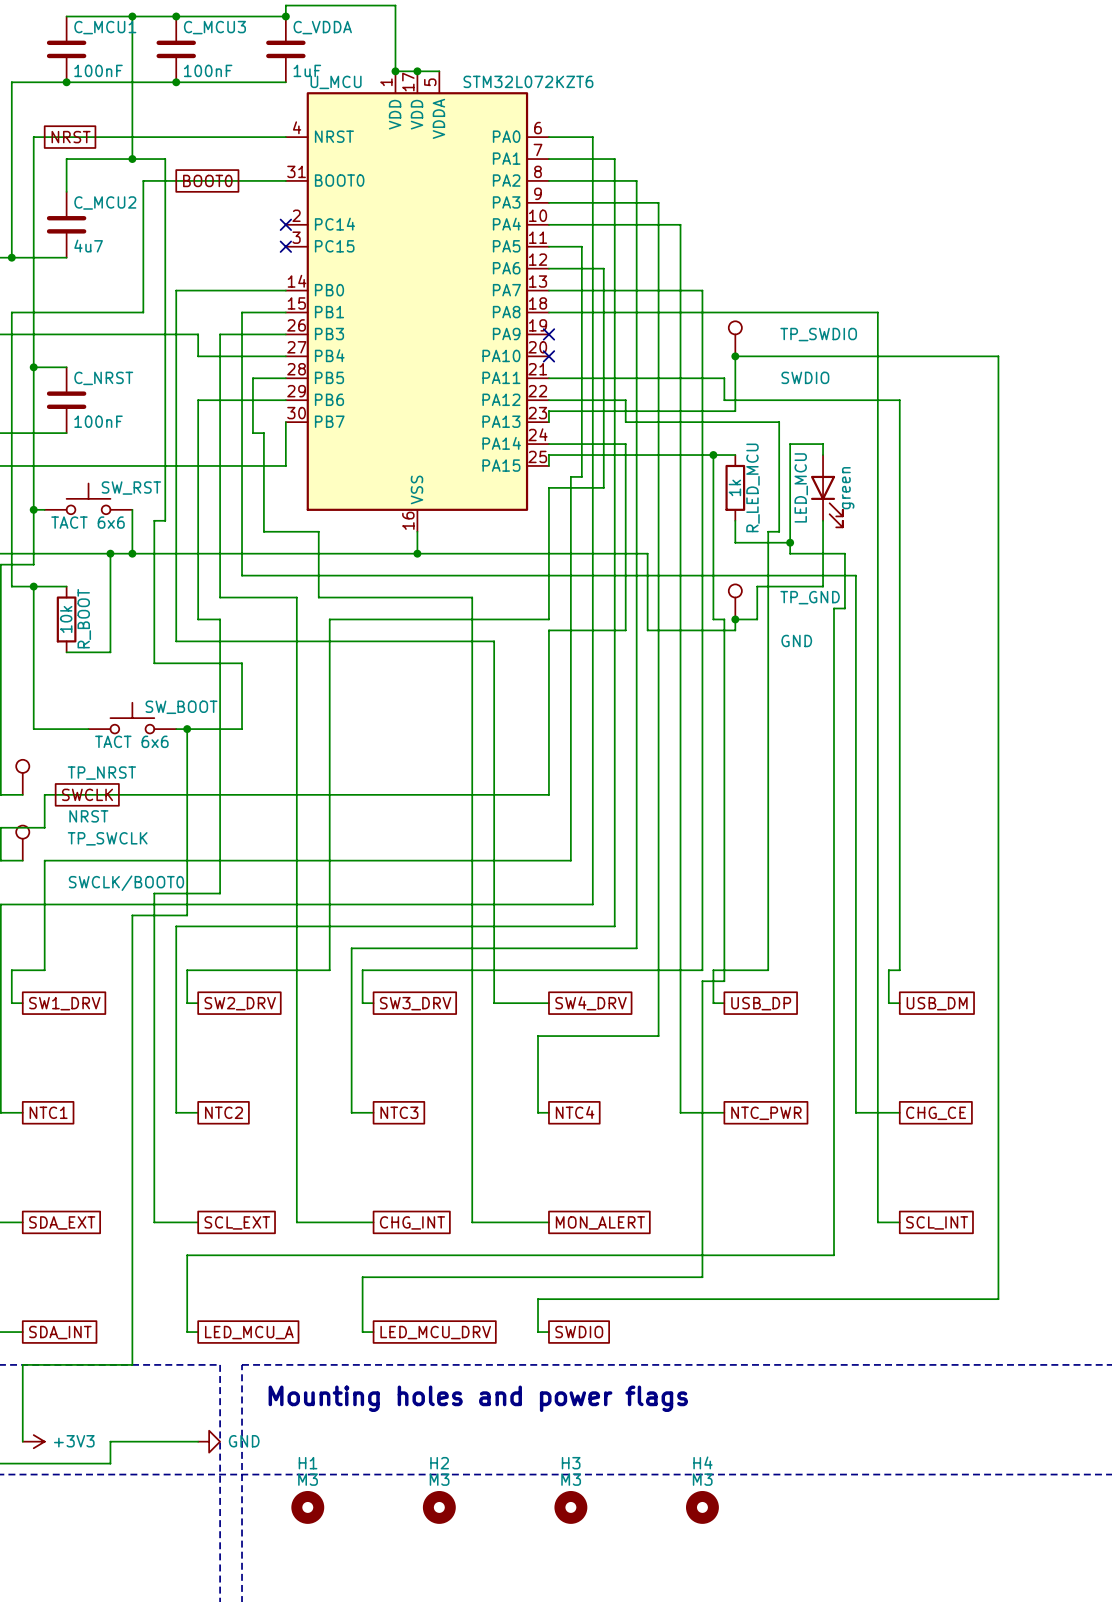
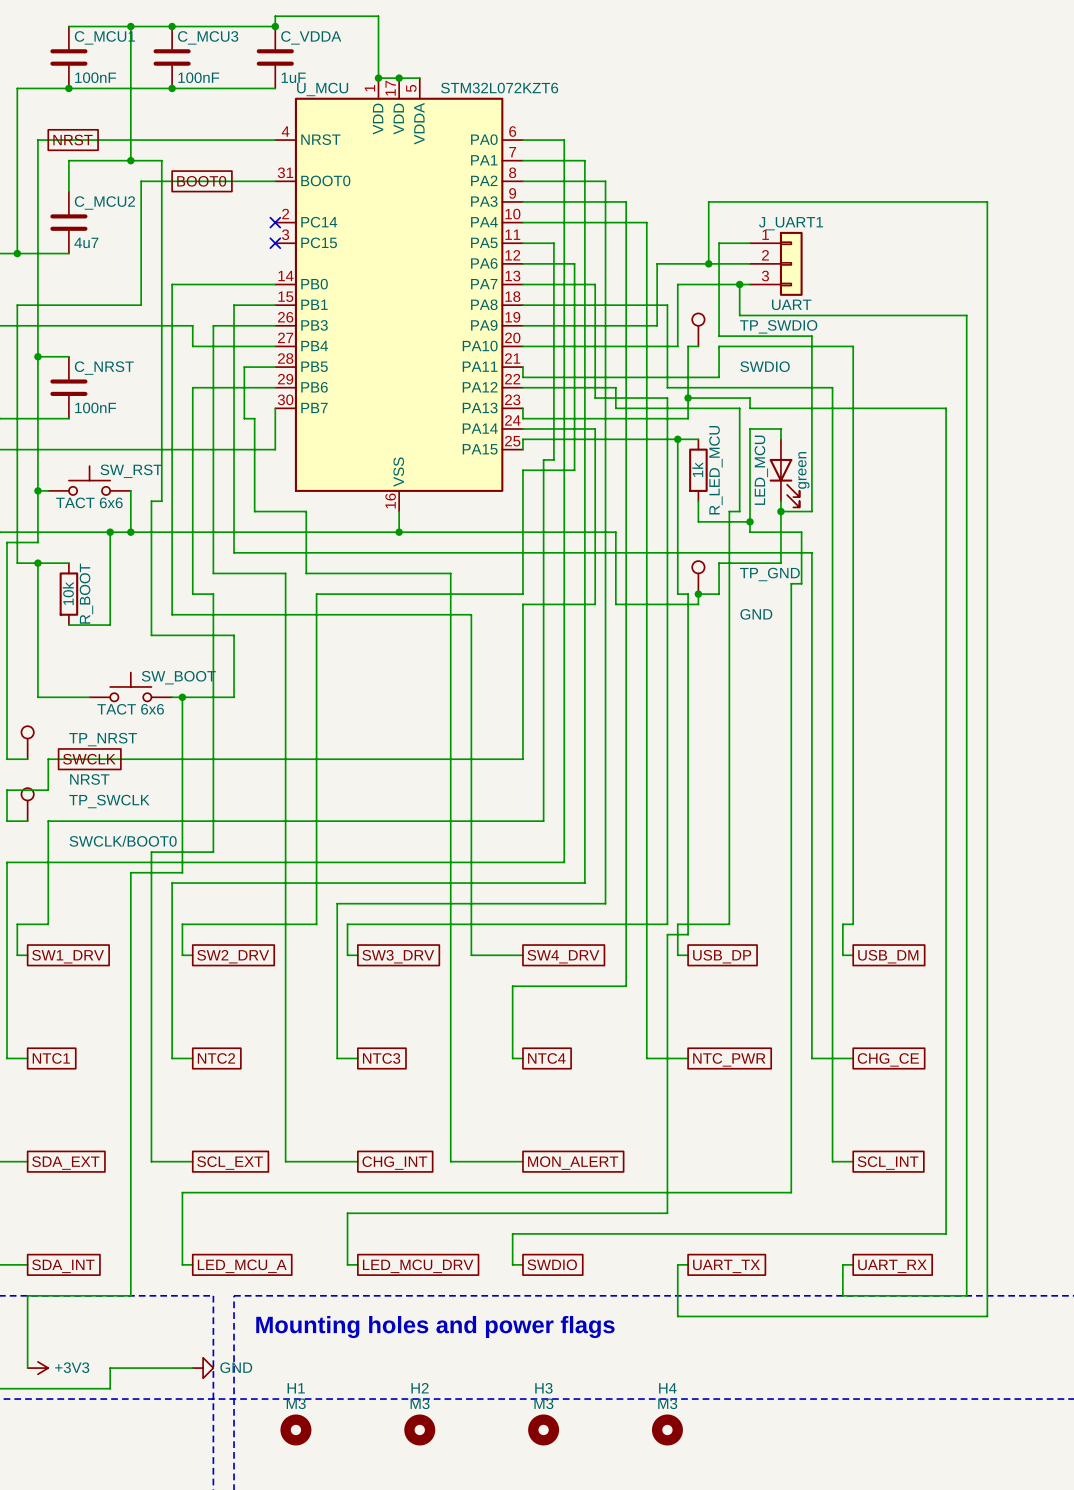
wire: none -> (750, 243) (719, 243) (719, 336) (811, 336) (811, 511) (780, 511)
wire: none -> (708, 263) (708, 201) (987, 201) (987, 1316) (677, 1316) (677, 1264) (688, 1264)
junction: none -> (708, 263)
wire: none -> (750, 263) (657, 263) (657, 325) (522, 325)
J_UART1: none -> UART (776, 263)
wire: (625, 290) (702, 290) (702, 312) (877, 312) (877, 400) (899, 400) -> (595, 284) (595, 387) (615, 387) (615, 408)
wire: none -> (739, 284) (739, 315) (966, 315) (966, 1295) (842, 1295) (842, 1264) (853, 1264)
junction: none -> (739, 284)
wire: none -> (750, 284) (677, 284) (677, 346) (522, 346)
no-connect mark: (548, 334) -> none
no-connect mark: (548, 356) -> none
wire: none -> (698, 346) (688, 346) (688, 367)
junction: (735, 356) -> none
wire: (757, 356) (735, 356) (735, 411) -> (946, 408) (750, 408) (750, 398) (698, 398)
wire: (899, 356) (998, 356) (998, 422) -> (853, 346) (853, 387)
wire: (548, 378) (724, 378) -> (522, 367) (522, 377) (719, 377) (719, 346)
wire: (702, 400) (702, 411) (724, 411) -> none
junction: none -> (688, 398)
wire: (548, 422) (548, 411) (625, 411) (625, 422) (647, 422) -> (522, 408) (522, 418) (688, 418) (688, 387) (667, 387)
junction: none -> (780, 511)
global label: none -> UART_TX (726, 1266)
global label: none -> UART_RX (892, 1266)

